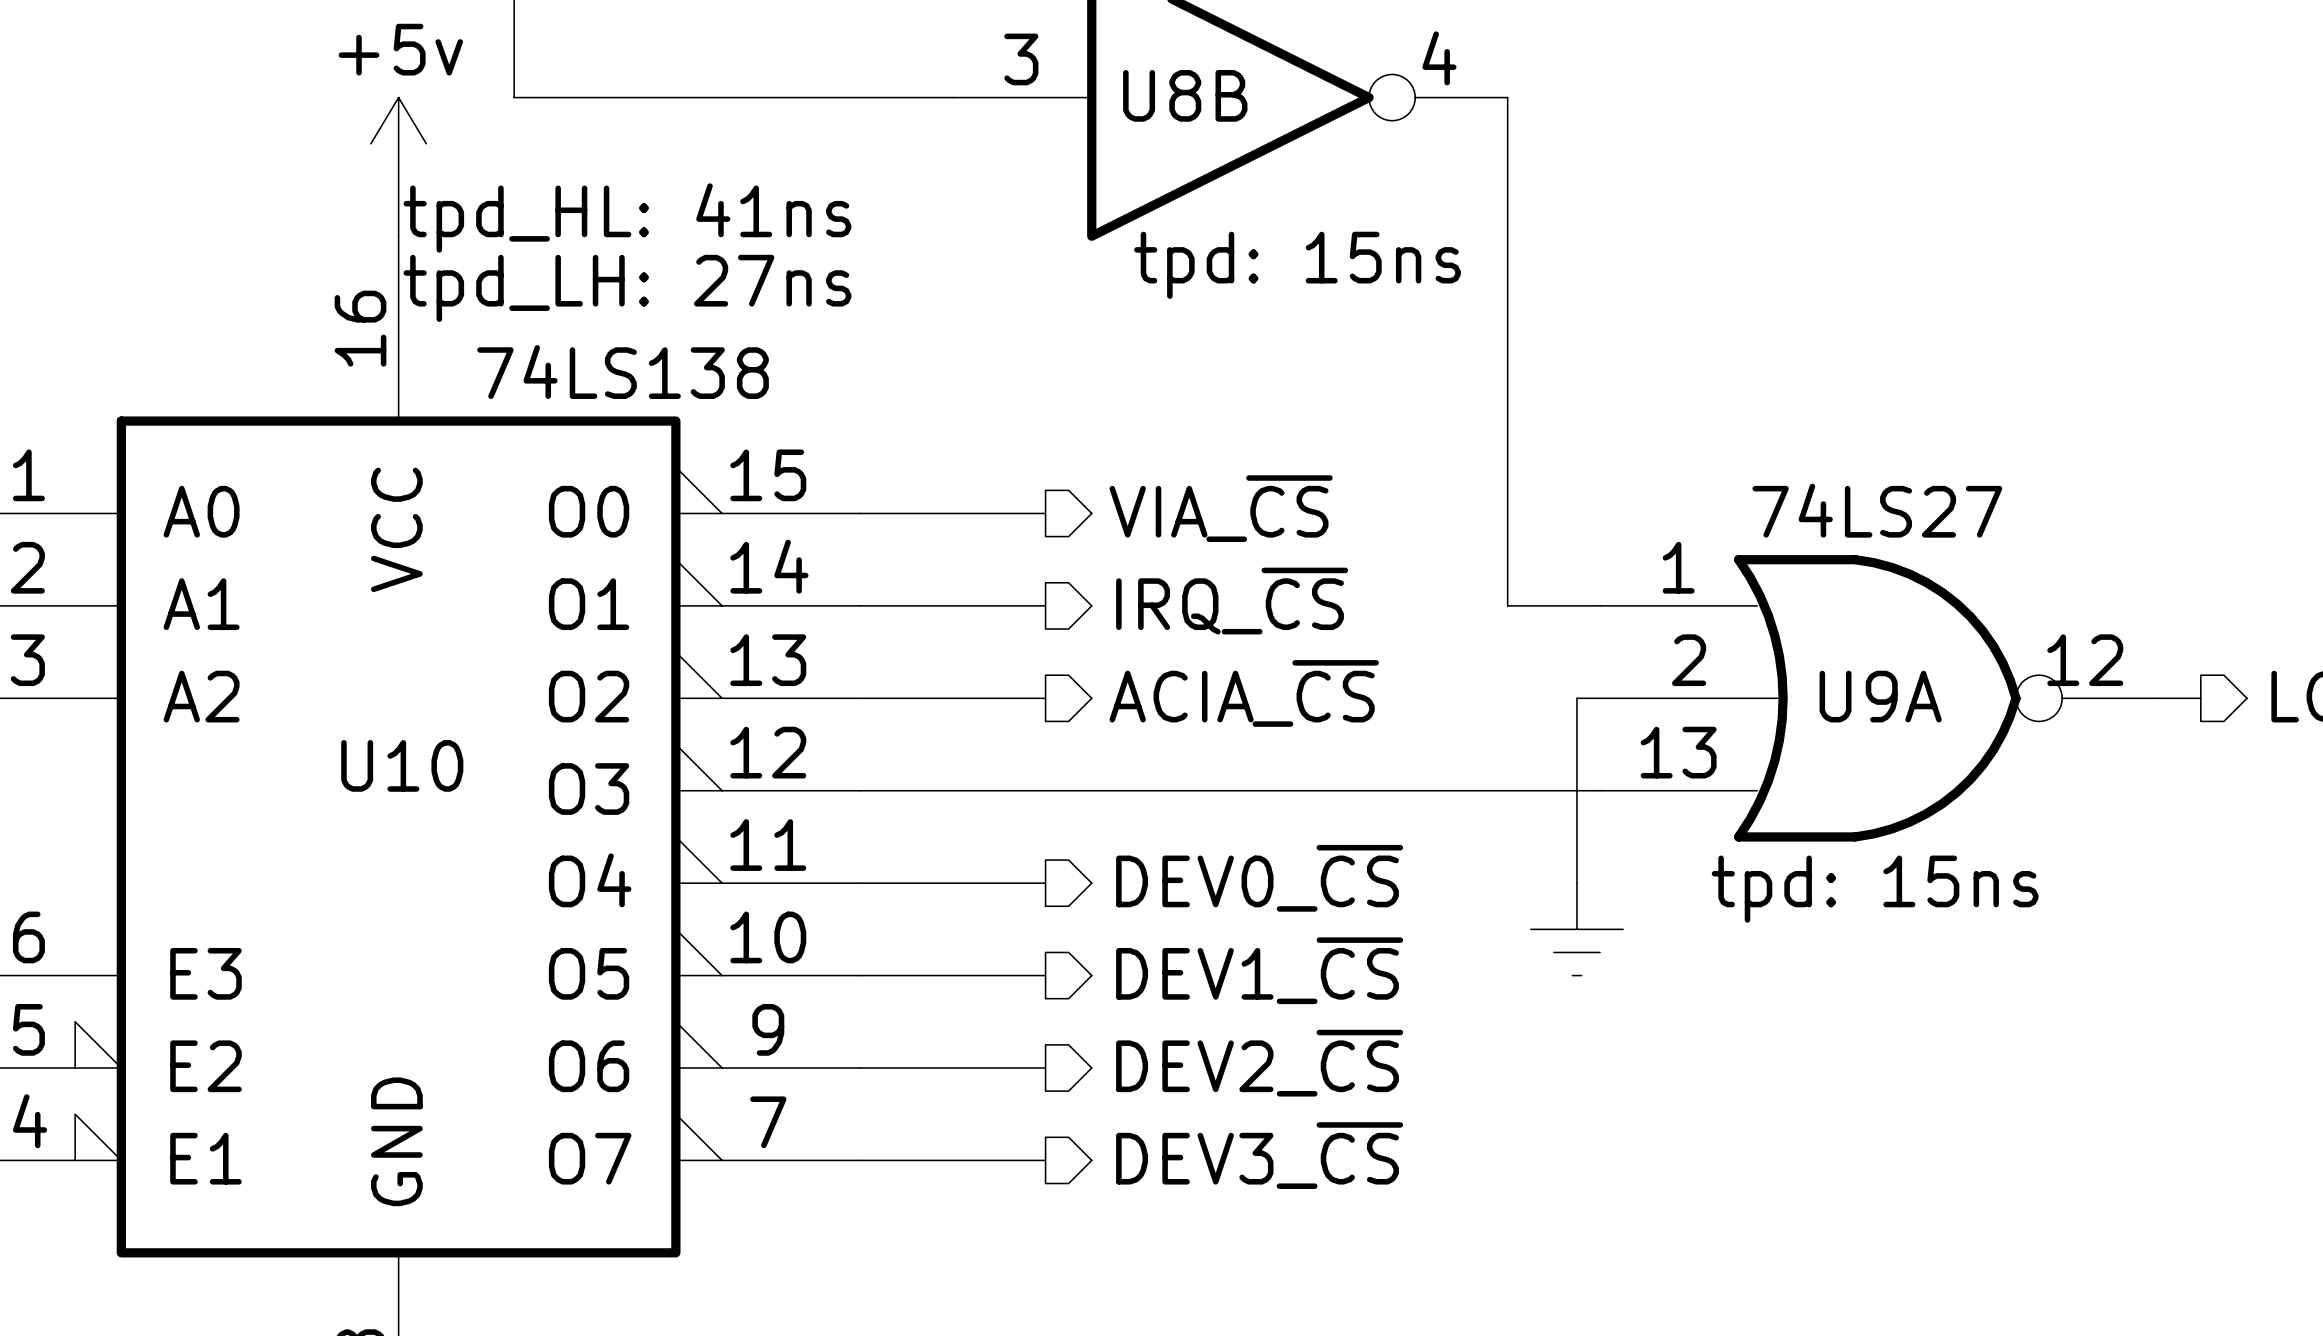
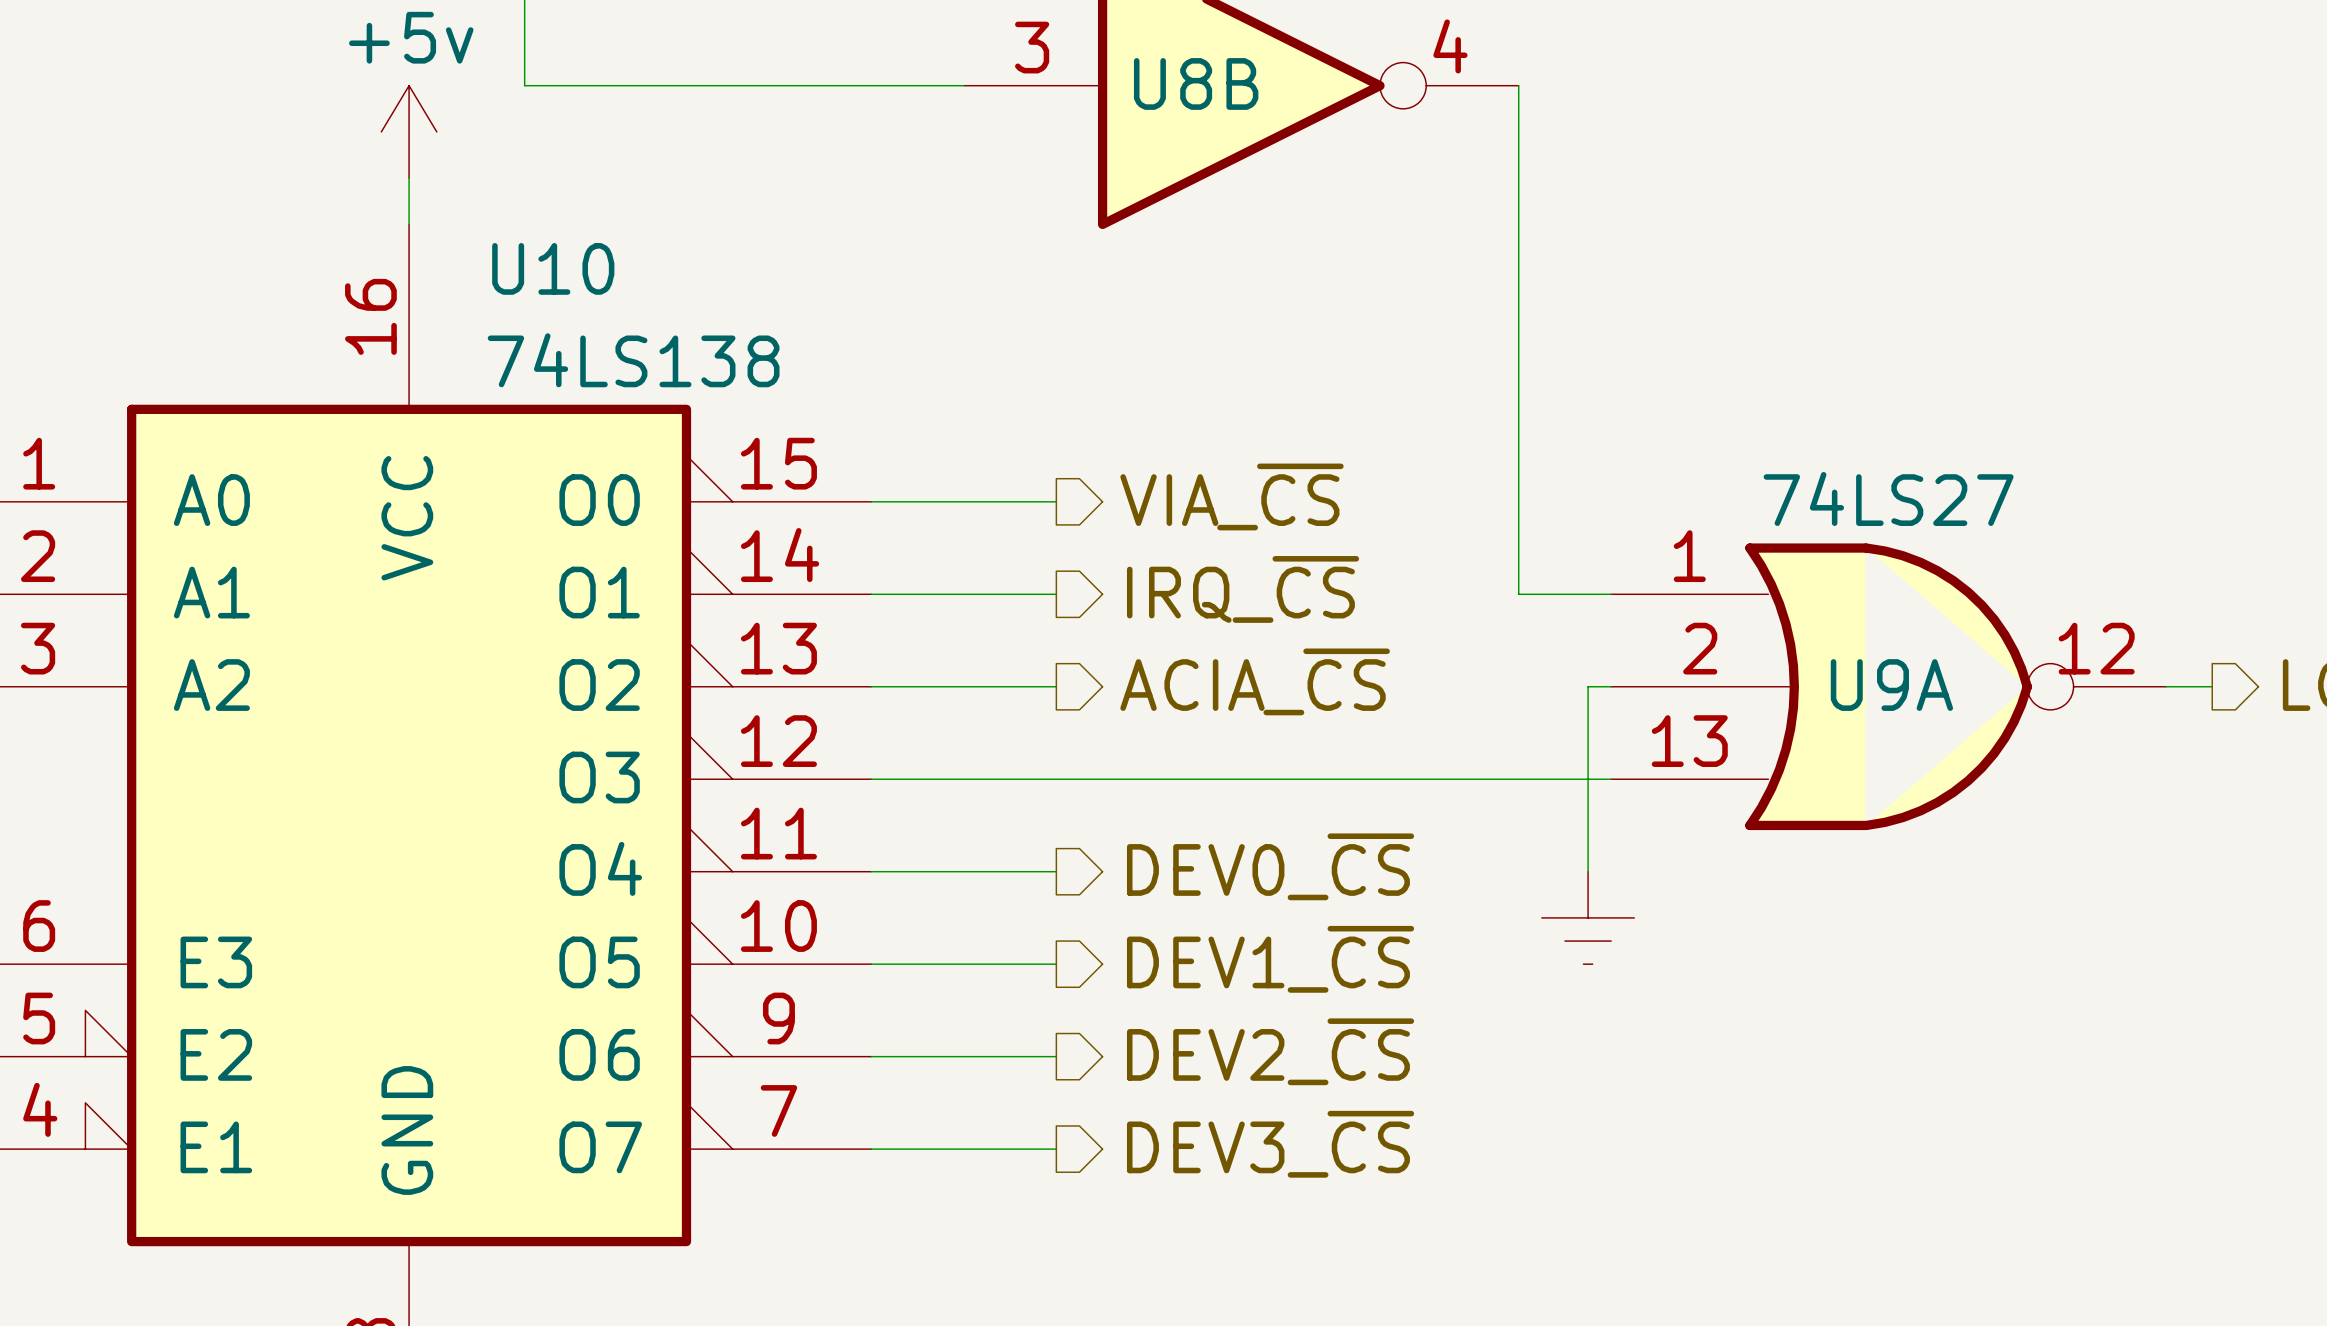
U10 text: tpd_HL: 41ns (627, 217) -> none
U8B text: tpd: 15ns (1297, 265) -> none
U10 text: tpd_LH: 27ns (627, 288) -> none
U10 name position: U10 (402, 765) -> U10 (553, 268)
U9A text: tpd: 15ns (1875, 889) -> none

